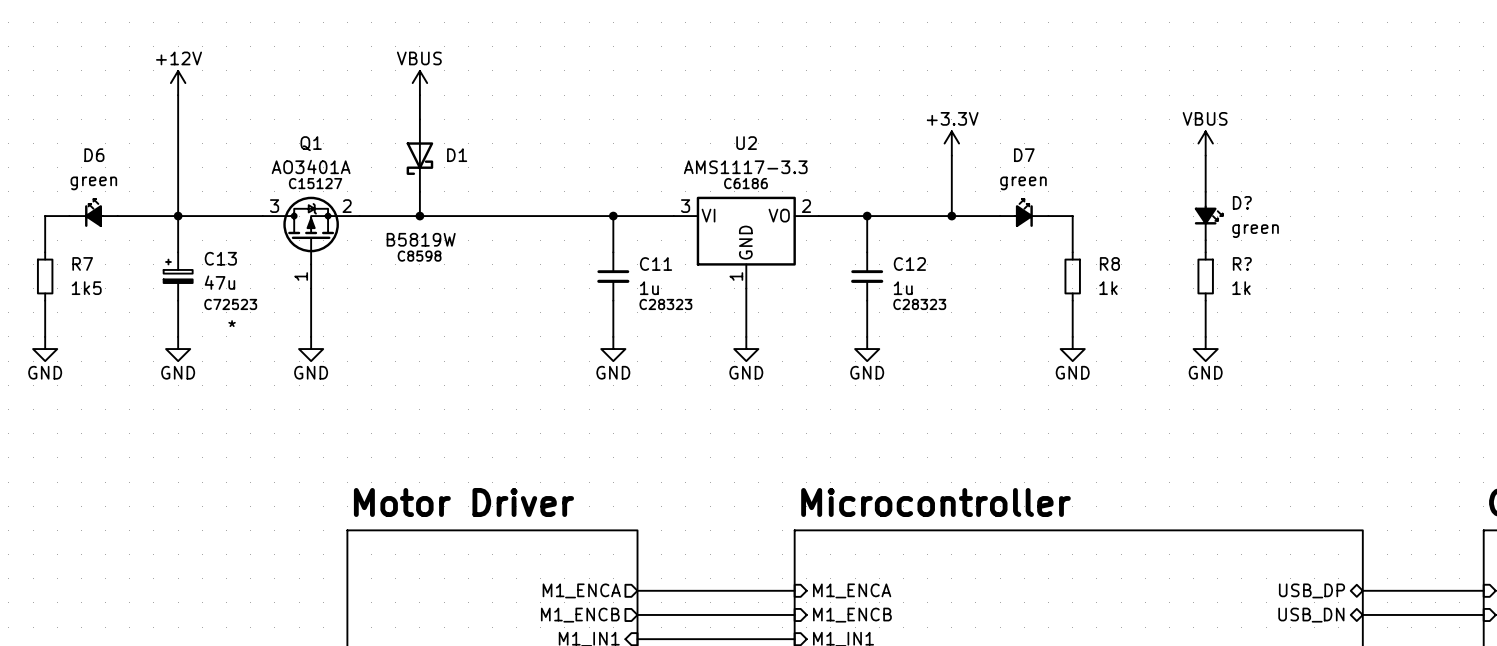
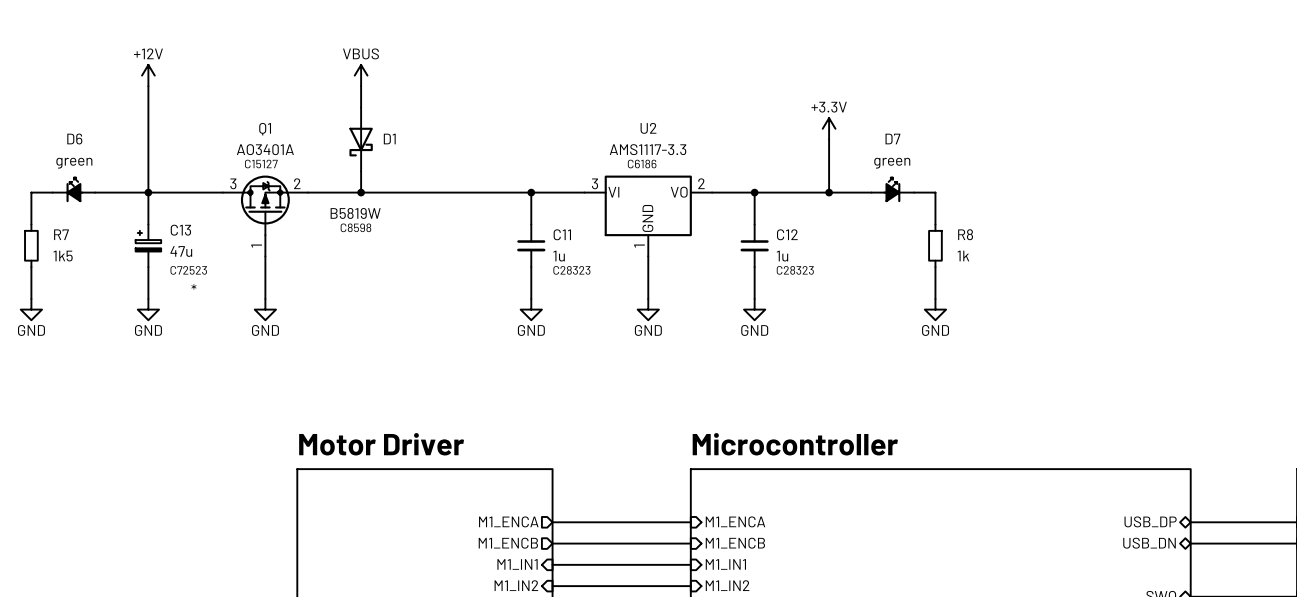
power symbol: VBUS (1205, 143) -> none
wire: (1205, 155) (1205, 191) -> none
D?: green (1208, 216) -> none
wire: (1205, 240) (1205, 252) -> none
R?: 1k (1205, 276) -> none
wire: (1205, 300) (1205, 336) -> none
power symbol: GND (1205, 349) -> none

